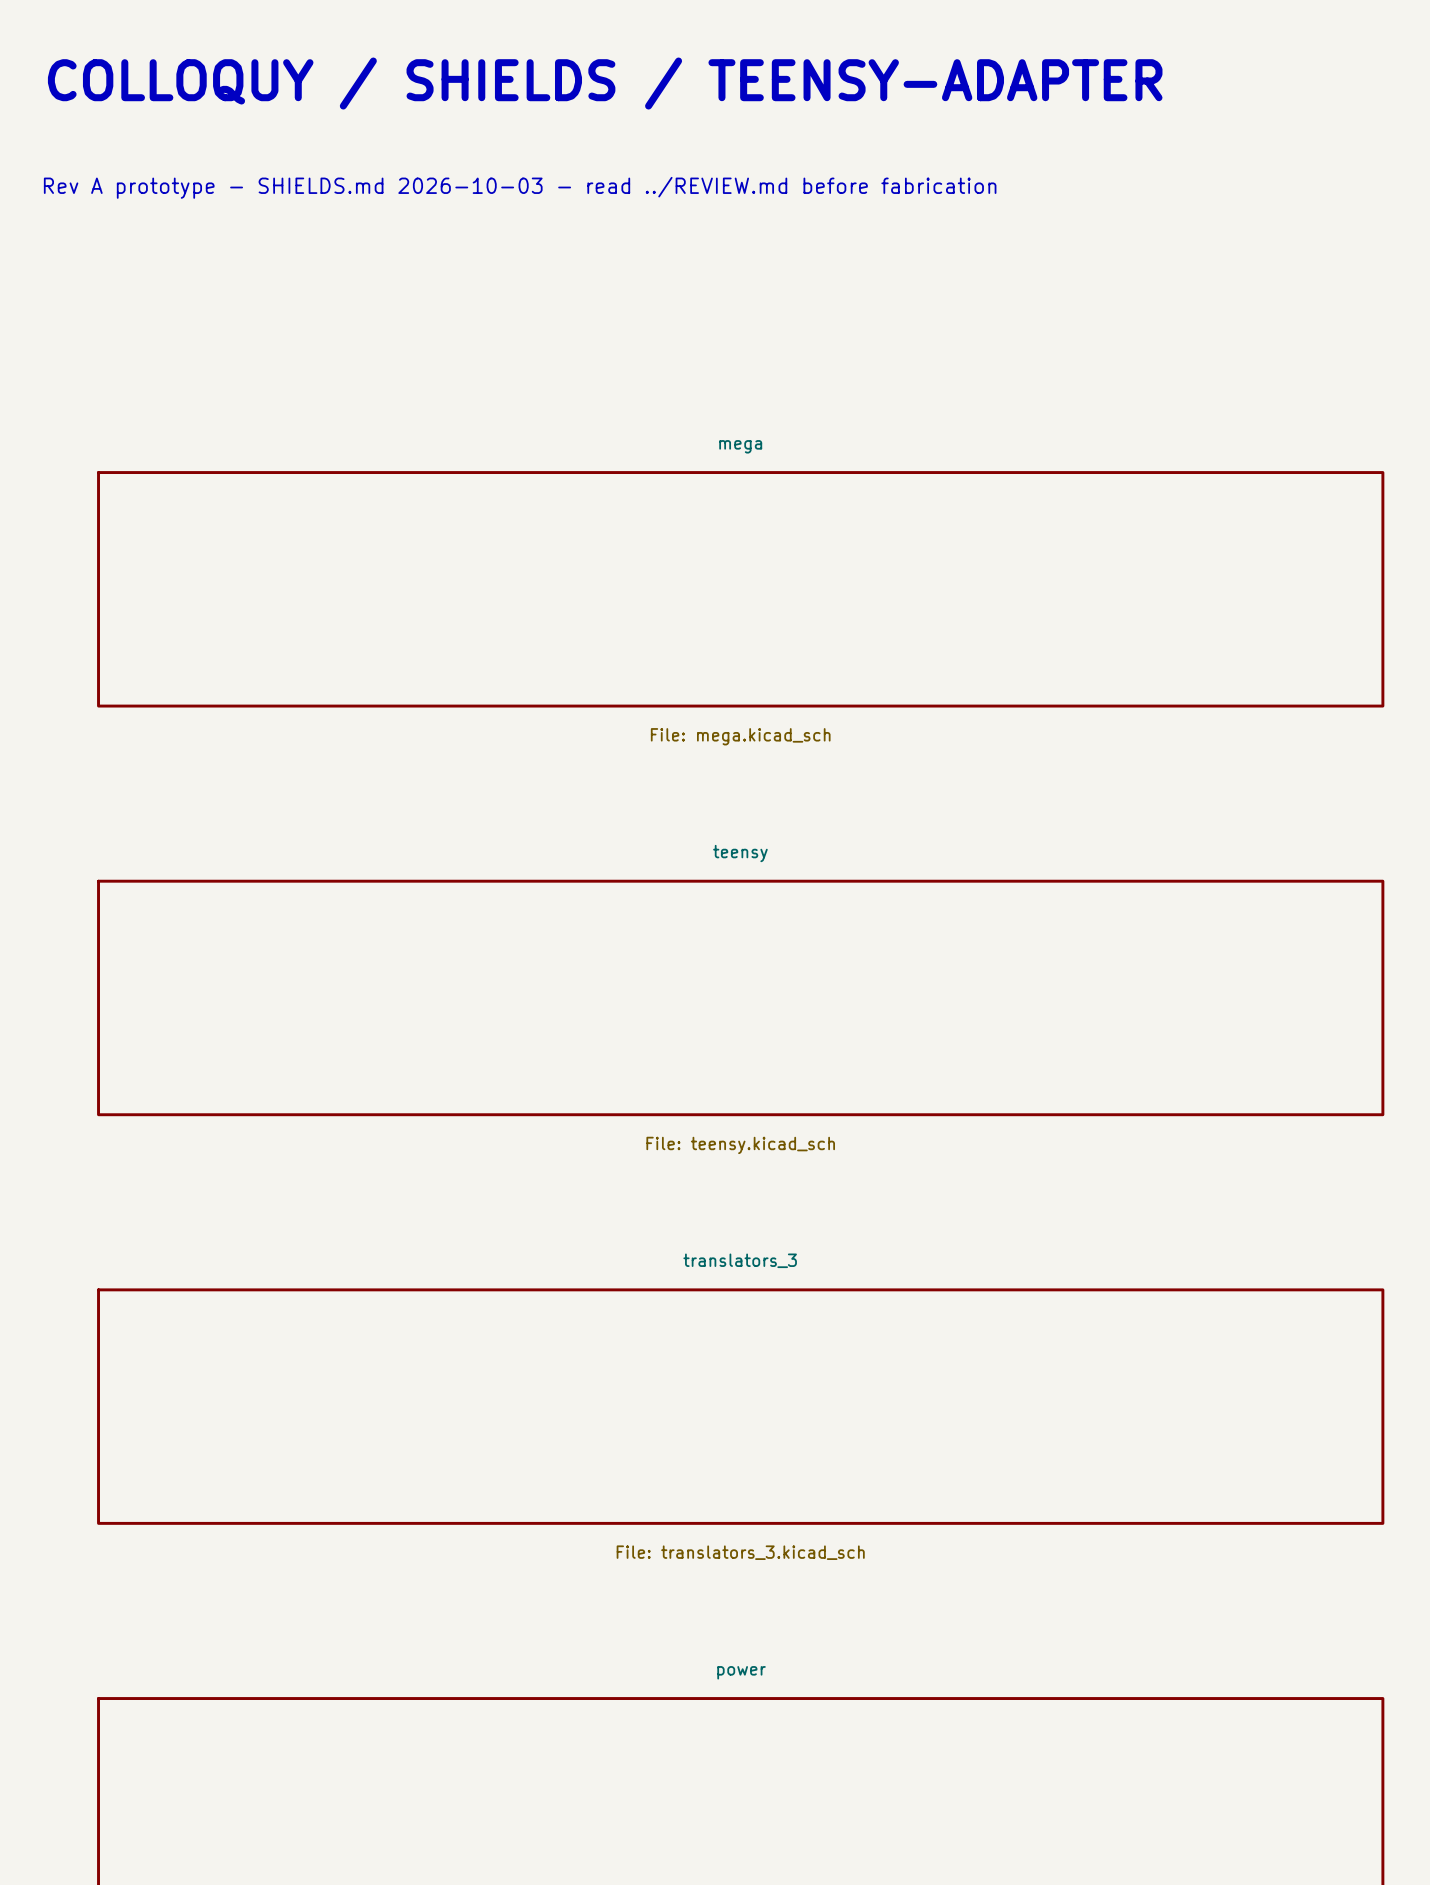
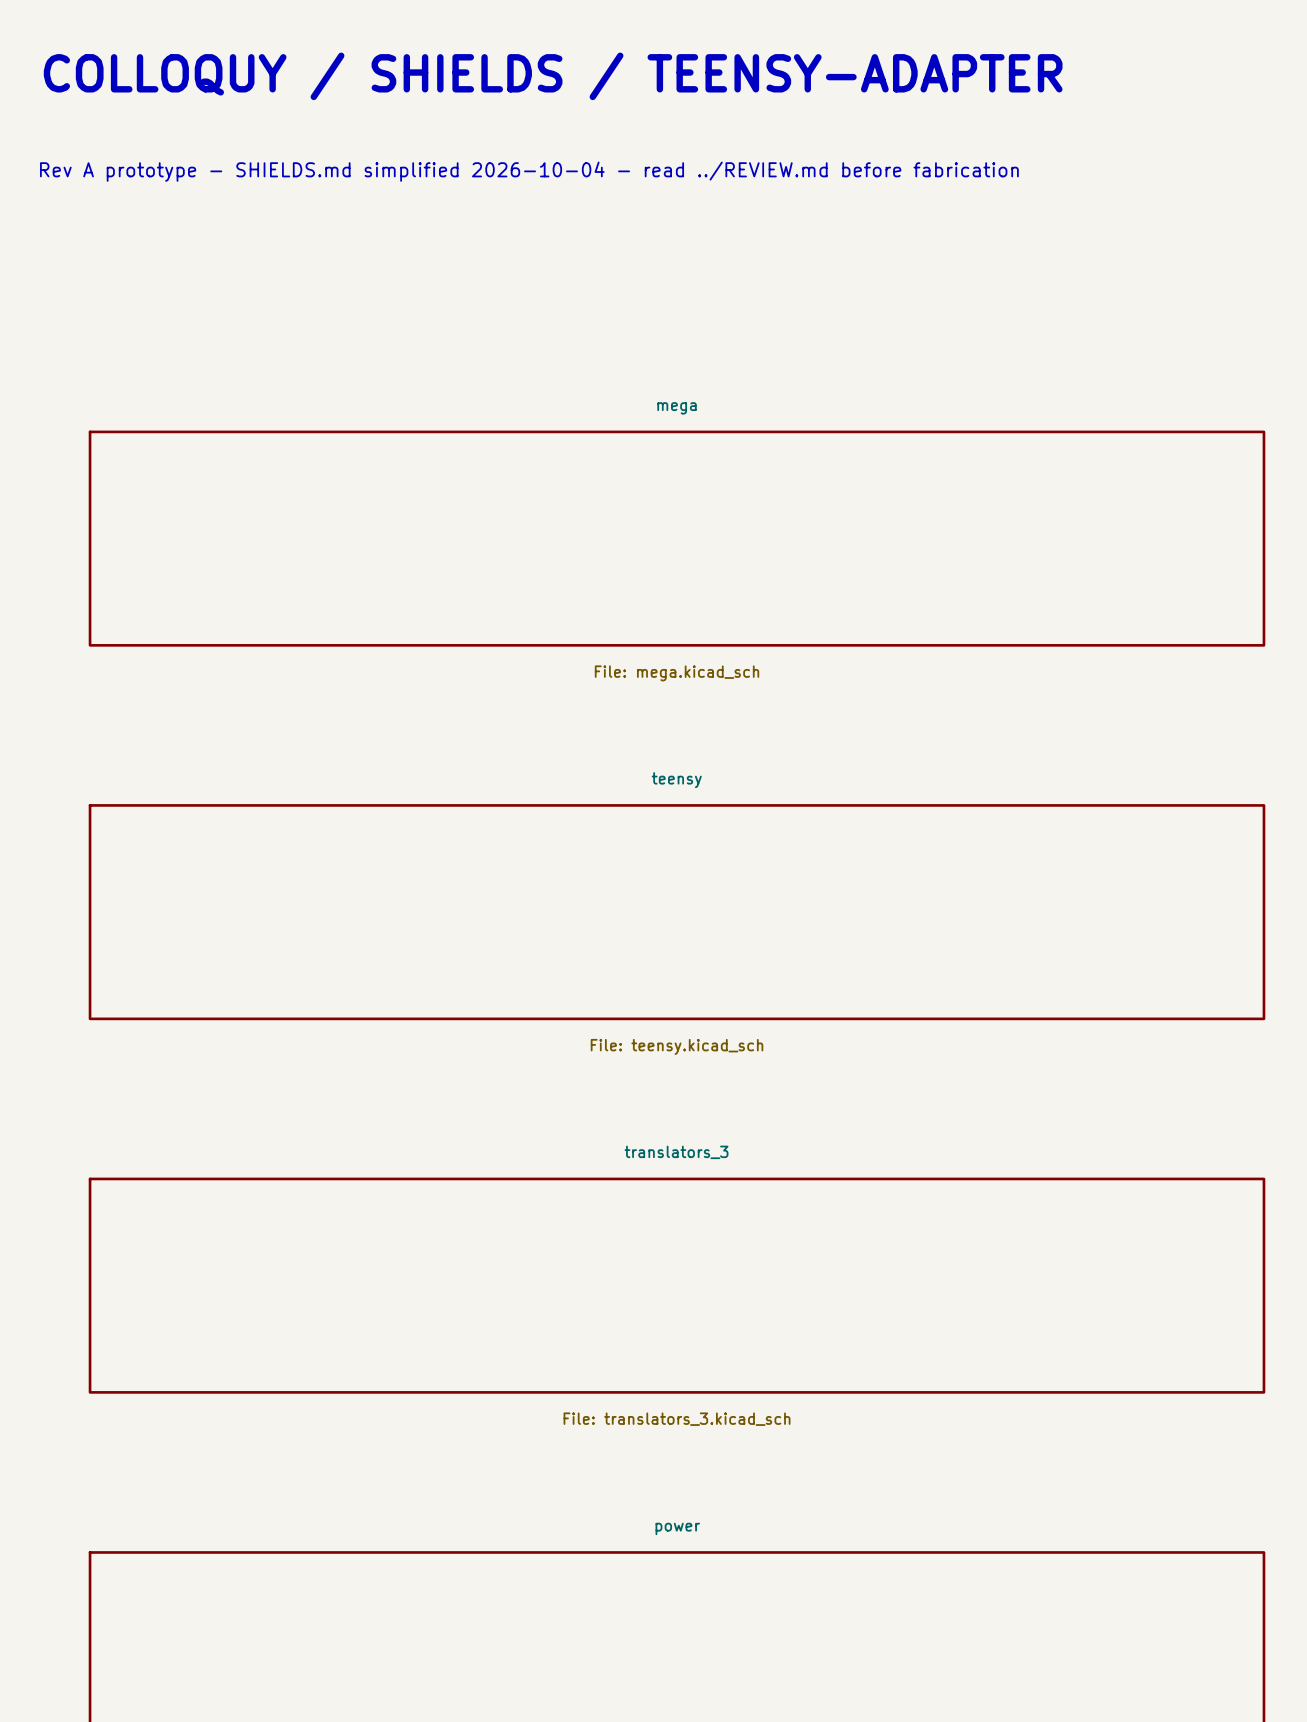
text: Rev A prototype - SHIELDS.md 2026-10-03 - read ../REVIEW.md before fabrication (520, 187) -> Rev A prototype - SHIELDS.md simplified 2026-10-04 - read ../REVIEW.md before fabrication (529, 171)

